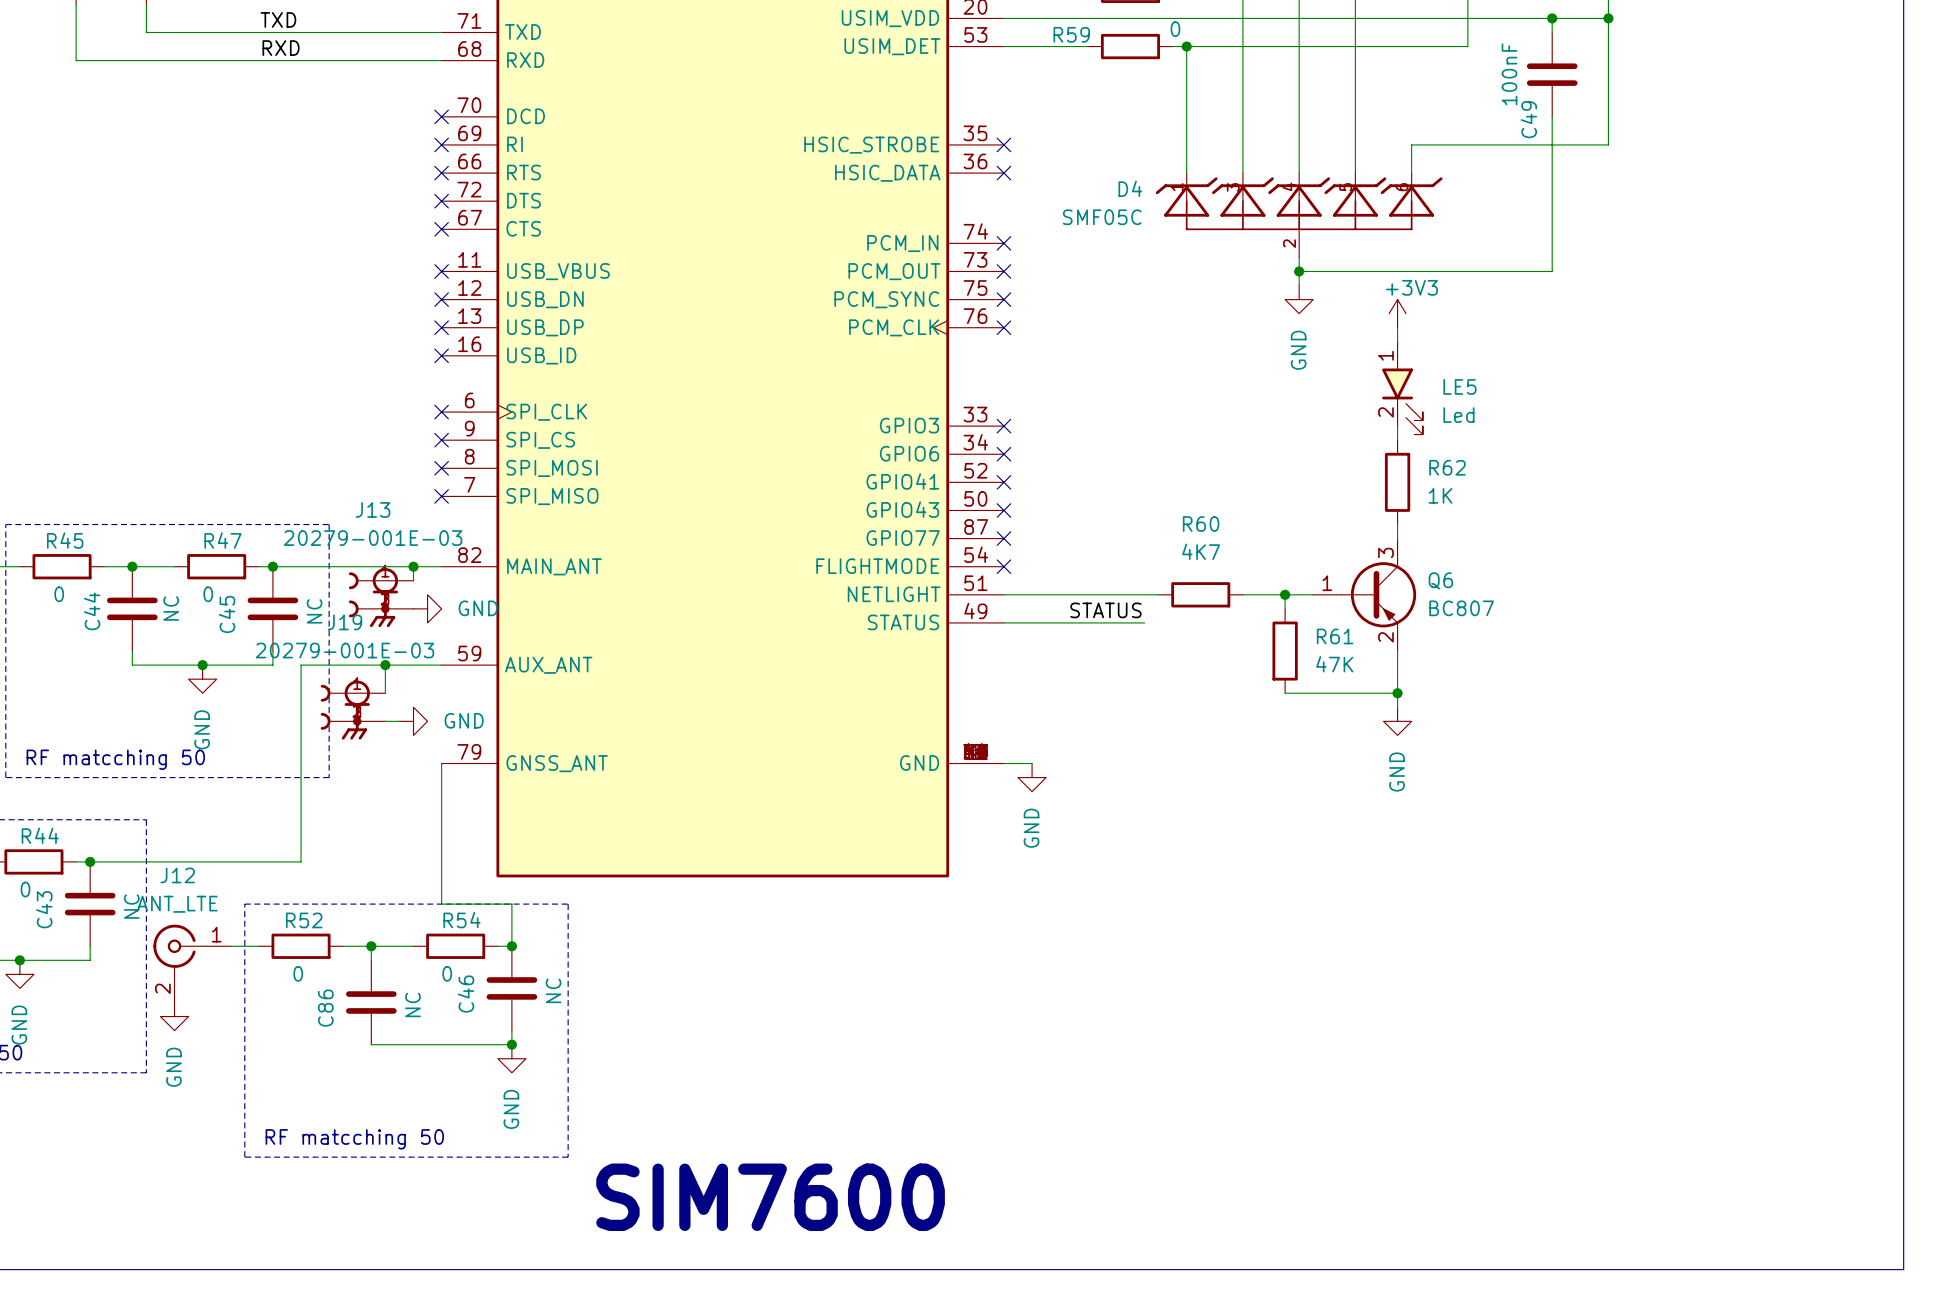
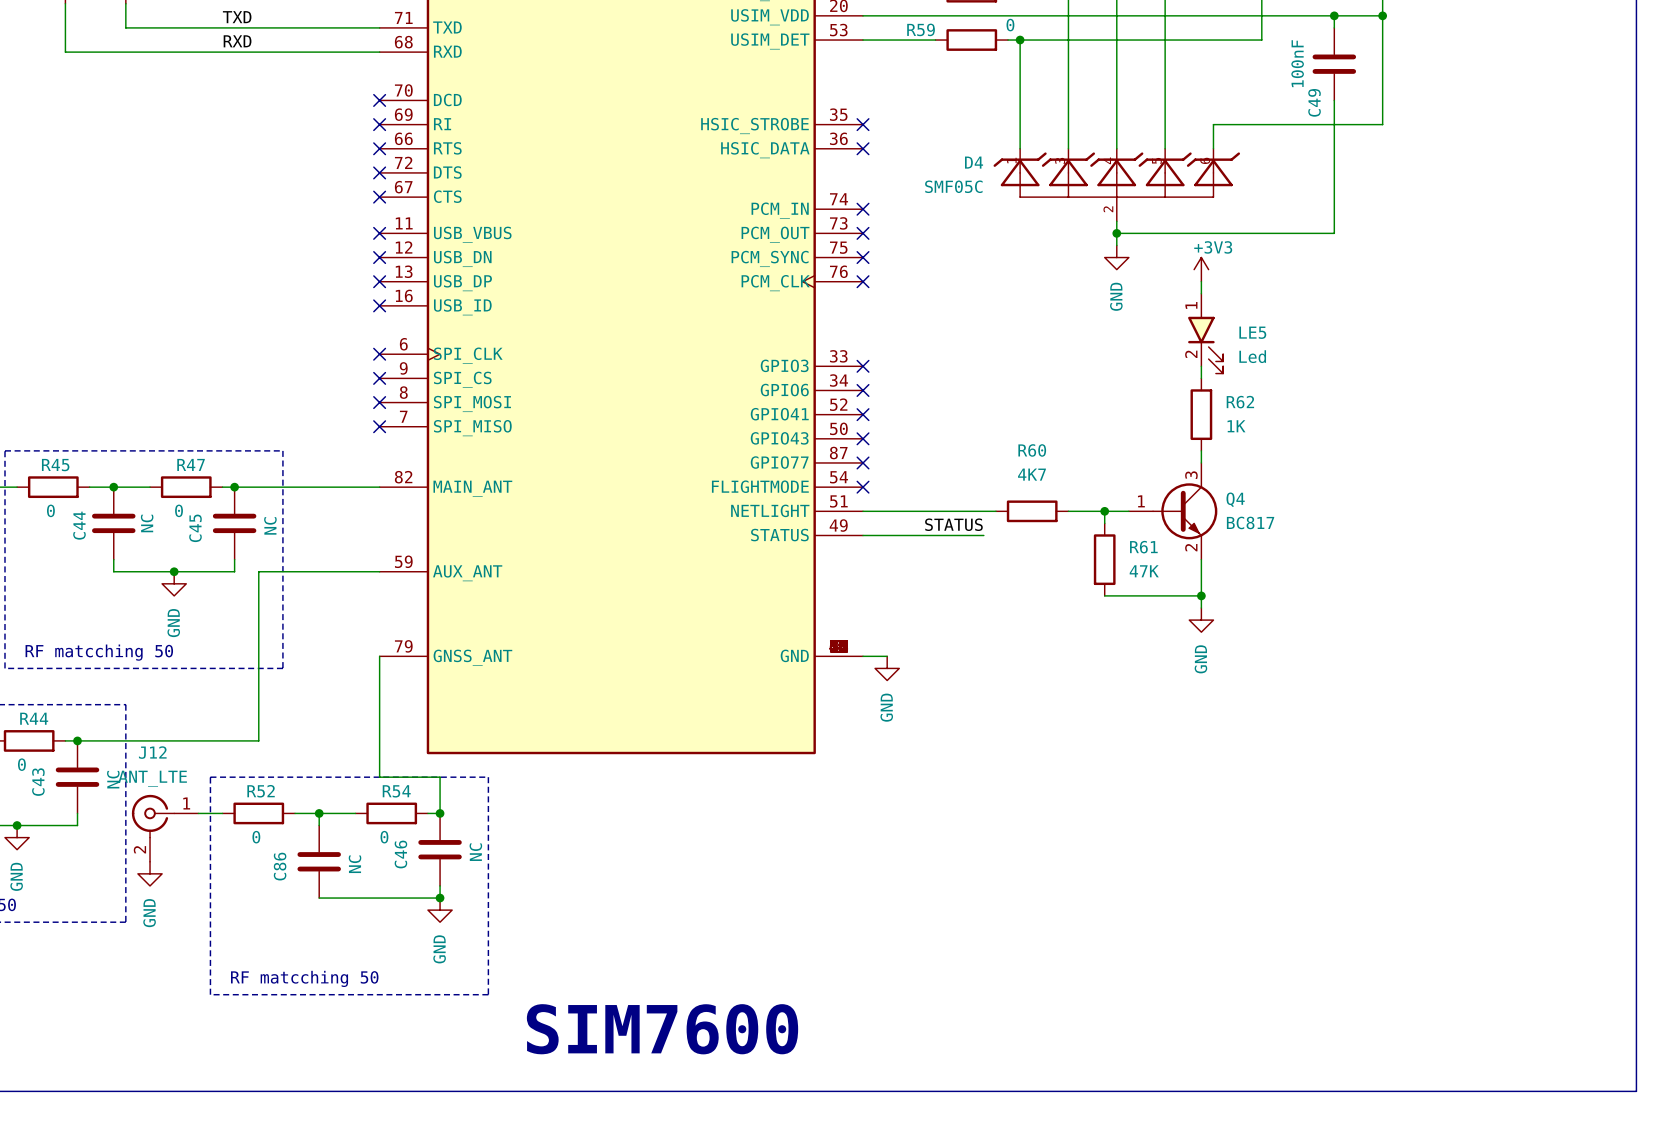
wire: (413, 566) (413, 580) -> none
junction: (413, 566) -> none
Q6: BC807 (1364, 594) -> none
Q4: none -> BC817 (1173, 511)
J13: 20279-001E-03 (381, 597) -> none
power symbol: GND (427, 608) -> none
wire: (385, 665) (385, 693) -> none
junction: (385, 665) -> none
J19: 20279-001E-03 (353, 710) -> none
wire: (385, 721) (399, 721) -> none
power symbol: GND (413, 721) -> none

